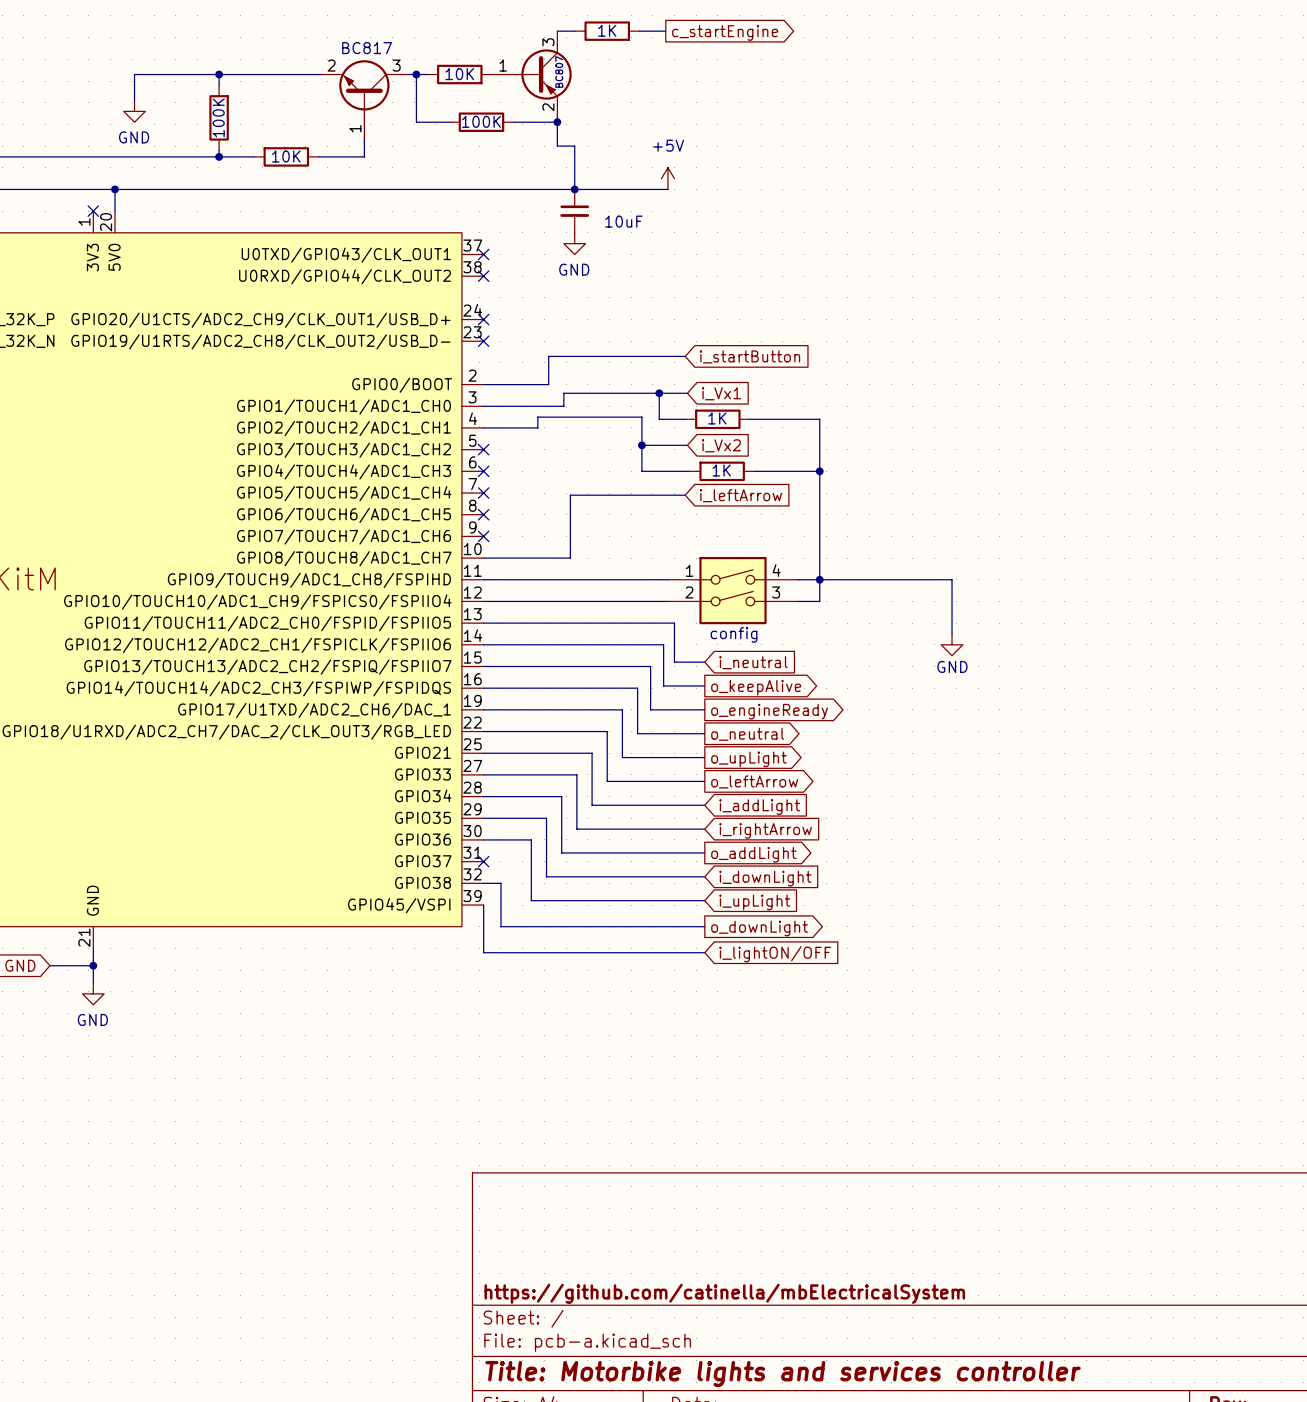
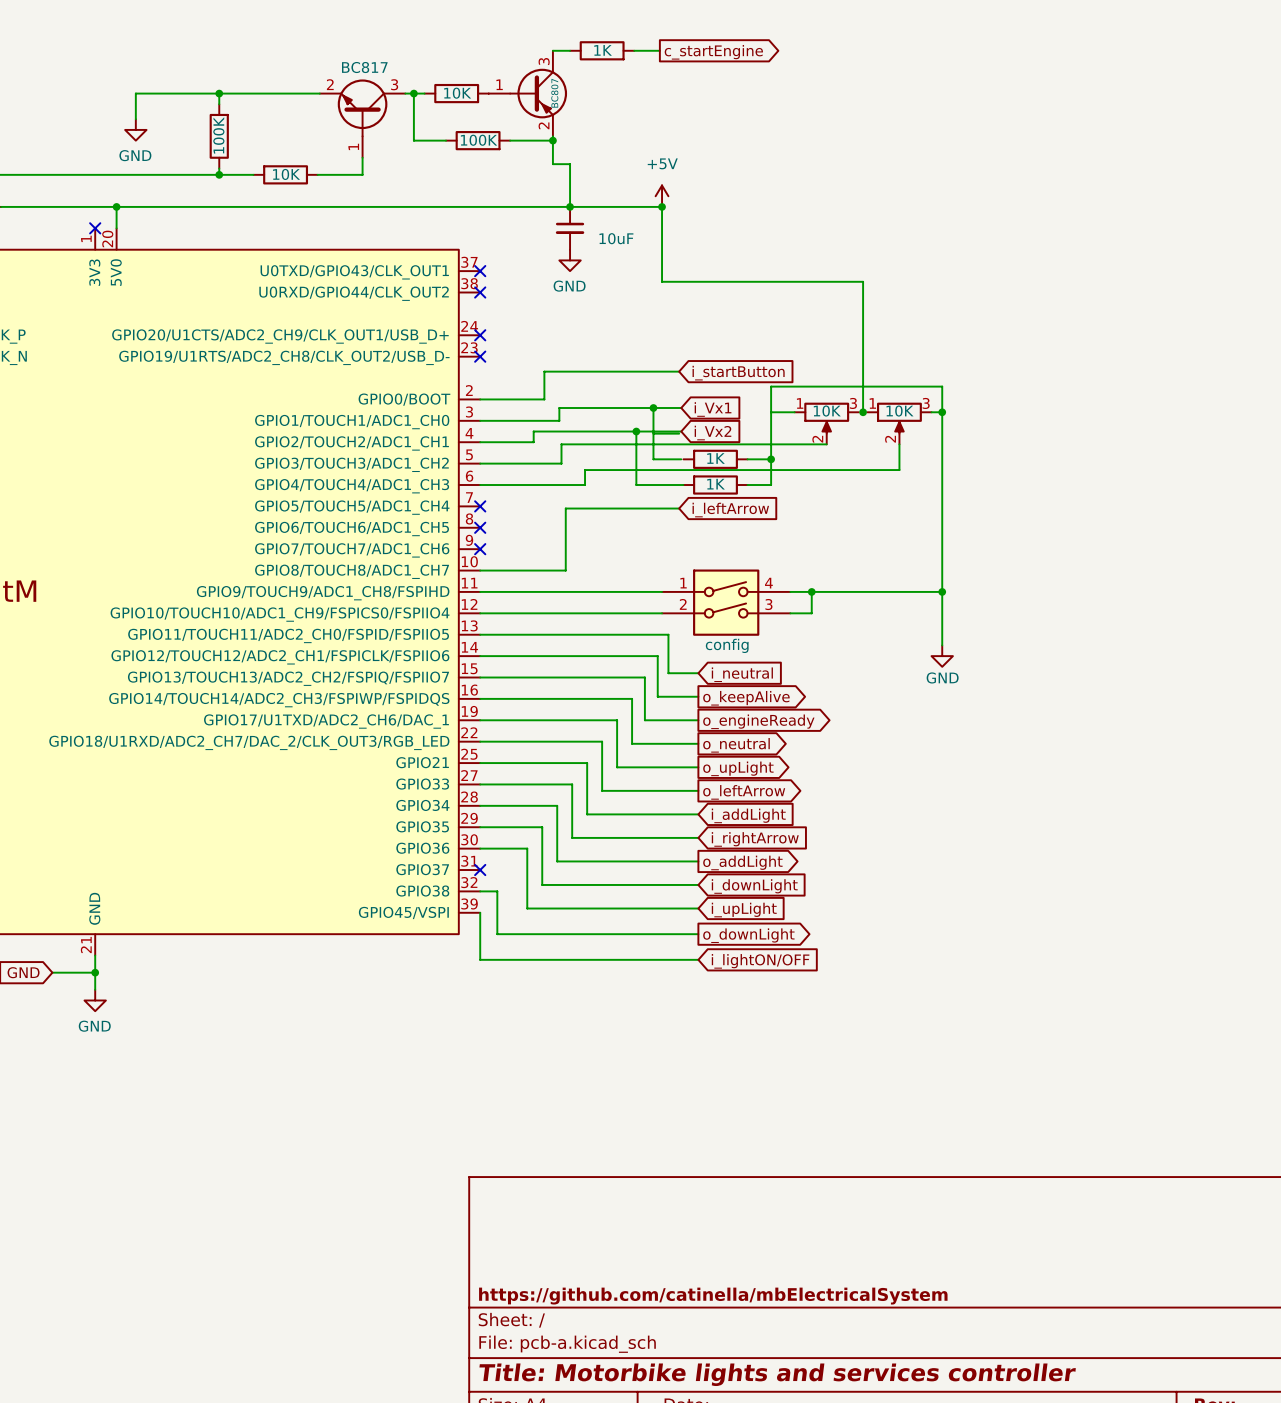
wire: none -> (662, 206) (662, 281) (863, 281) (863, 412)
junction: none -> (662, 206)
wire: none -> (771, 412) (794, 412)
junction: none -> (863, 412)
wire: none -> (931, 412) (942, 412)
junction: none -> (942, 412)
part: none -> 10K (826, 423)
part: none -> 10K (899, 423)
wire: none -> (636, 431) (681, 431)
part position: (717, 419) -> (715, 459)
wire: (750, 419) (819, 419) (819, 579) -> none
wire: none -> (826, 444) (561, 444) (561, 463) (480, 463)
wire: none -> (899, 444) (899, 470) (585, 470) (585, 485) (480, 485)
wire: (641, 445) (659, 445) -> (653, 433) (653, 459)
junction position: (641, 445) -> (636, 431)
global label position: i_Vx2 (721, 445) -> i_Vx2 (712, 433)
wire: none -> (747, 459) (771, 459)
junction: none -> (771, 459)
no-connect mark: (483, 449) -> none
no-connect mark: (483, 471) -> none
wire: (778, 471) (819, 471) -> (771, 485) (771, 386) (942, 386) (942, 591)
junction: (819, 471) -> none
junction: none -> (942, 591)

